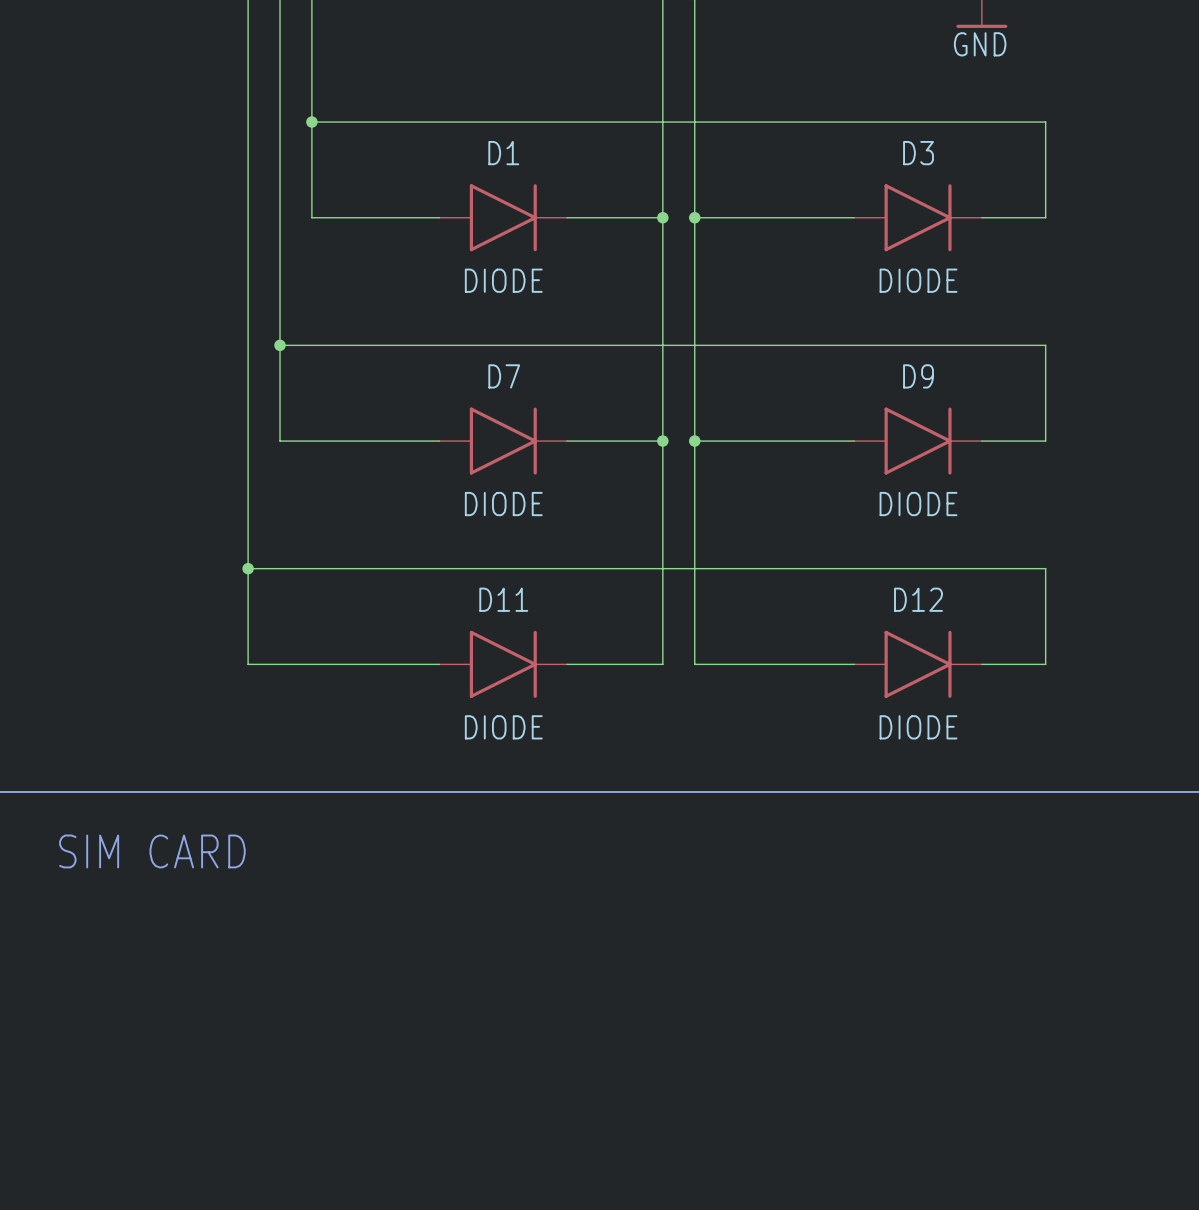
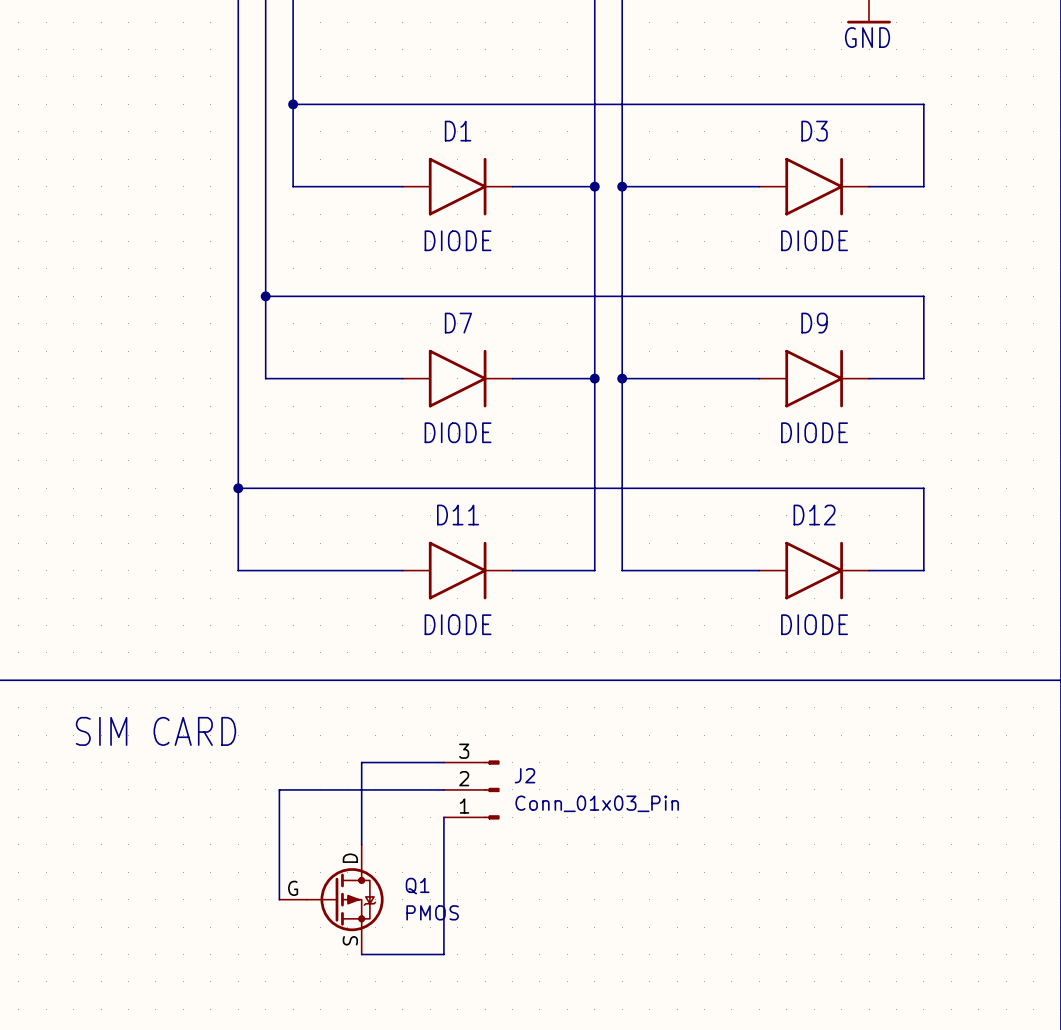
wire: none -> (443, 762) (361, 762) (361, 844)
wire: none -> (443, 789) (279, 789) (279, 899)
J2: none -> Conn_01x03_Pin (471, 789)
wire: none -> (443, 817) (443, 954) (361, 954)
Q1: none -> PMOS (331, 899)

